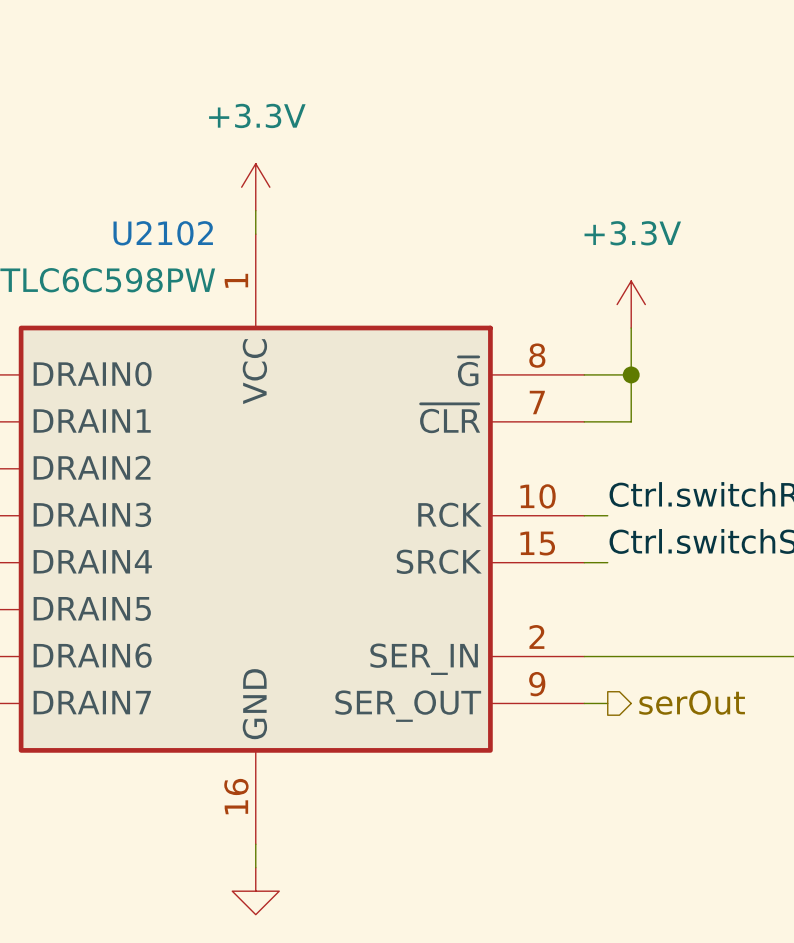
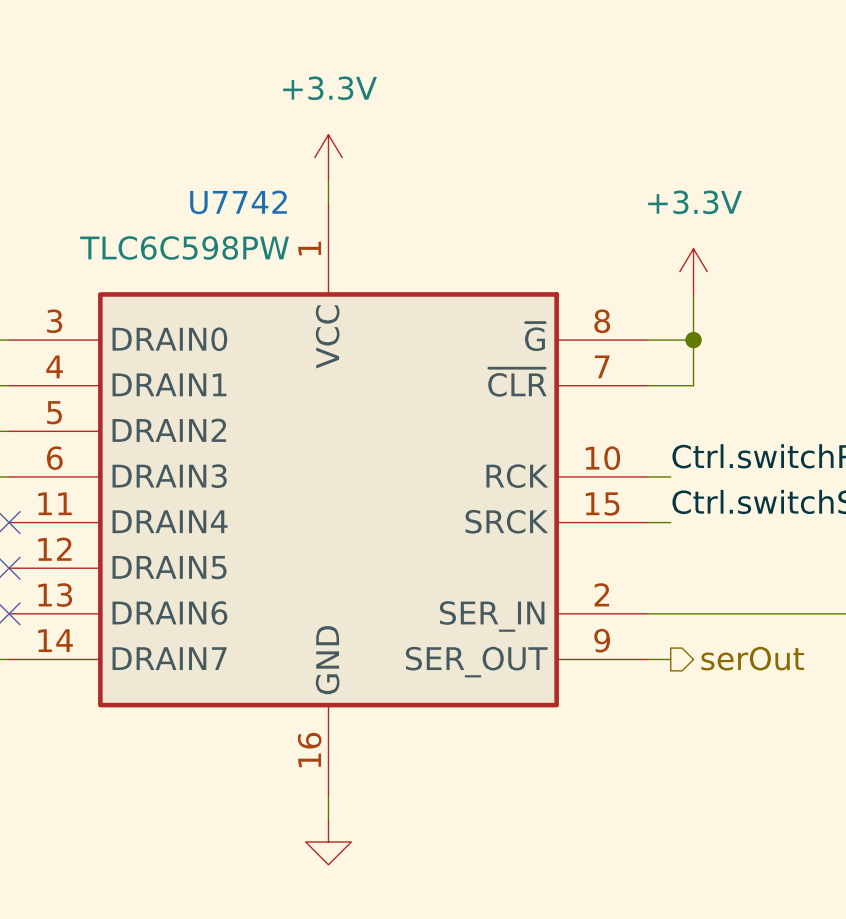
U2102 name: U2102 (163, 233) -> U7742 (238, 202)

